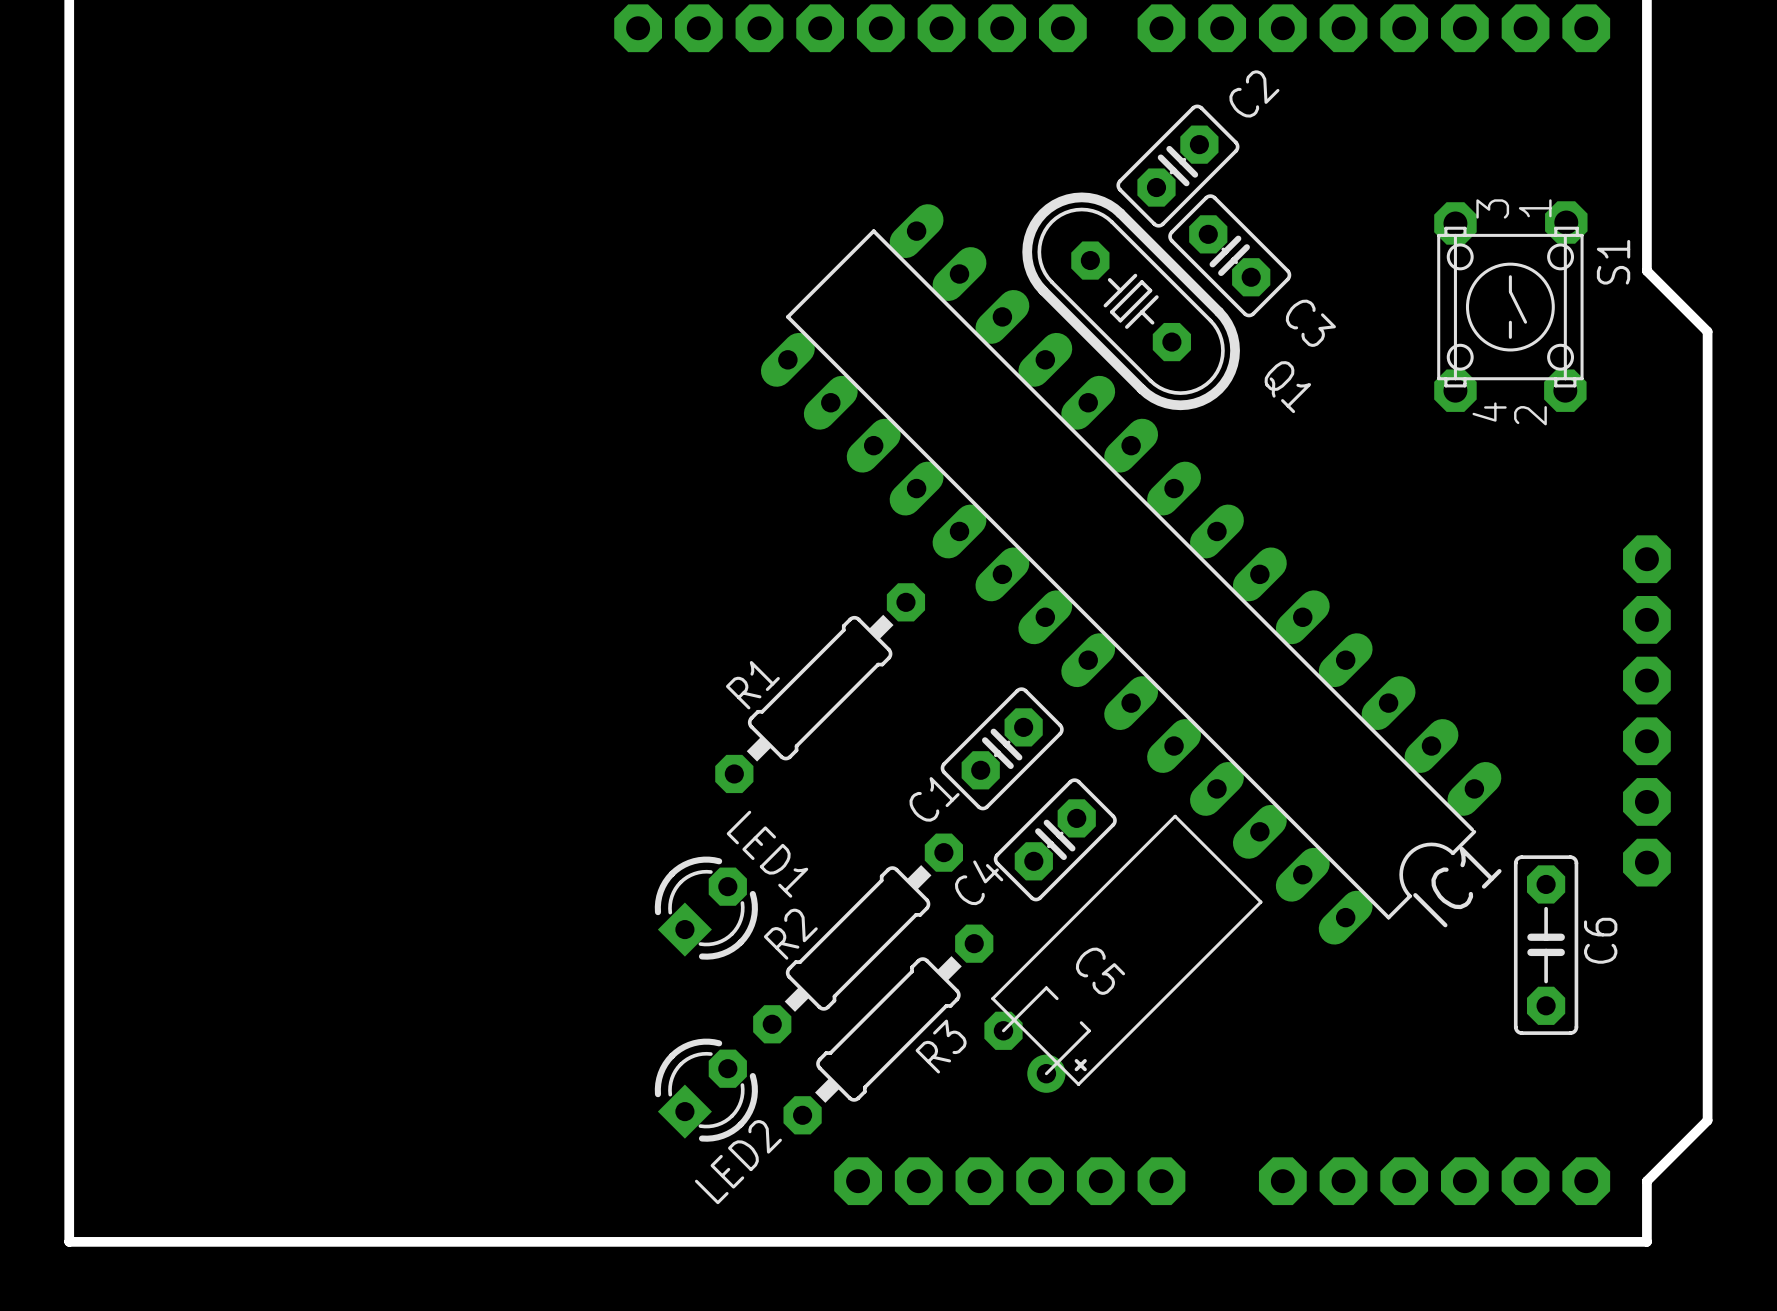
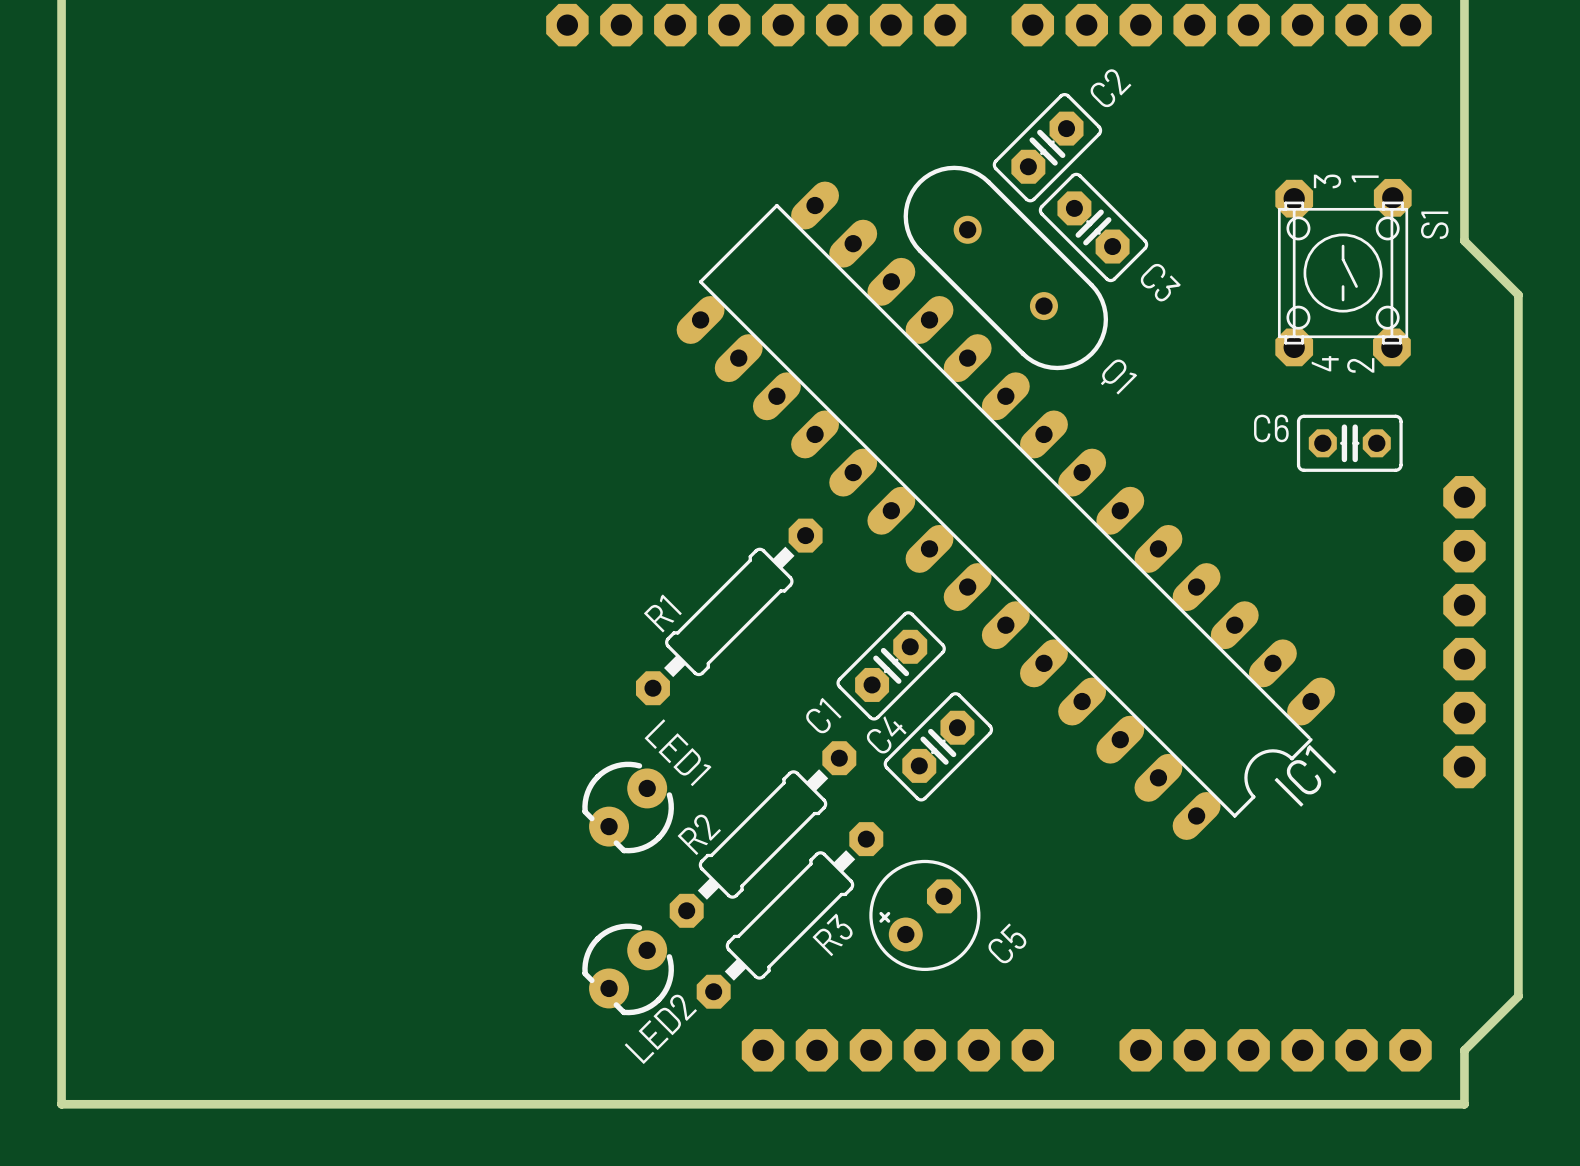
Q1 footprint: [1022, 192, 1240, 411] -> [903, 165, 1109, 371]
Q1 name position: Q1 (1287, 387) -> Q1 (1119, 376)
C5 footprint: [984, 814, 1263, 1093] -> [869, 859, 981, 972]
C6 footprint: [1513, 855, 1579, 1035] -> [1296, 414, 1403, 472]
LED1 footprint: [654, 856, 758, 960] -> [582, 761, 674, 854]
C4 name position: C4 (979, 882) -> C4 (886, 735)
C6 name position: C6 (1600, 940) -> C6 (1271, 428)
C5 name position: C5 (1100, 971) -> C5 (1007, 943)
LED2 footprint: [654, 1038, 758, 1142] -> [582, 923, 674, 1016]

